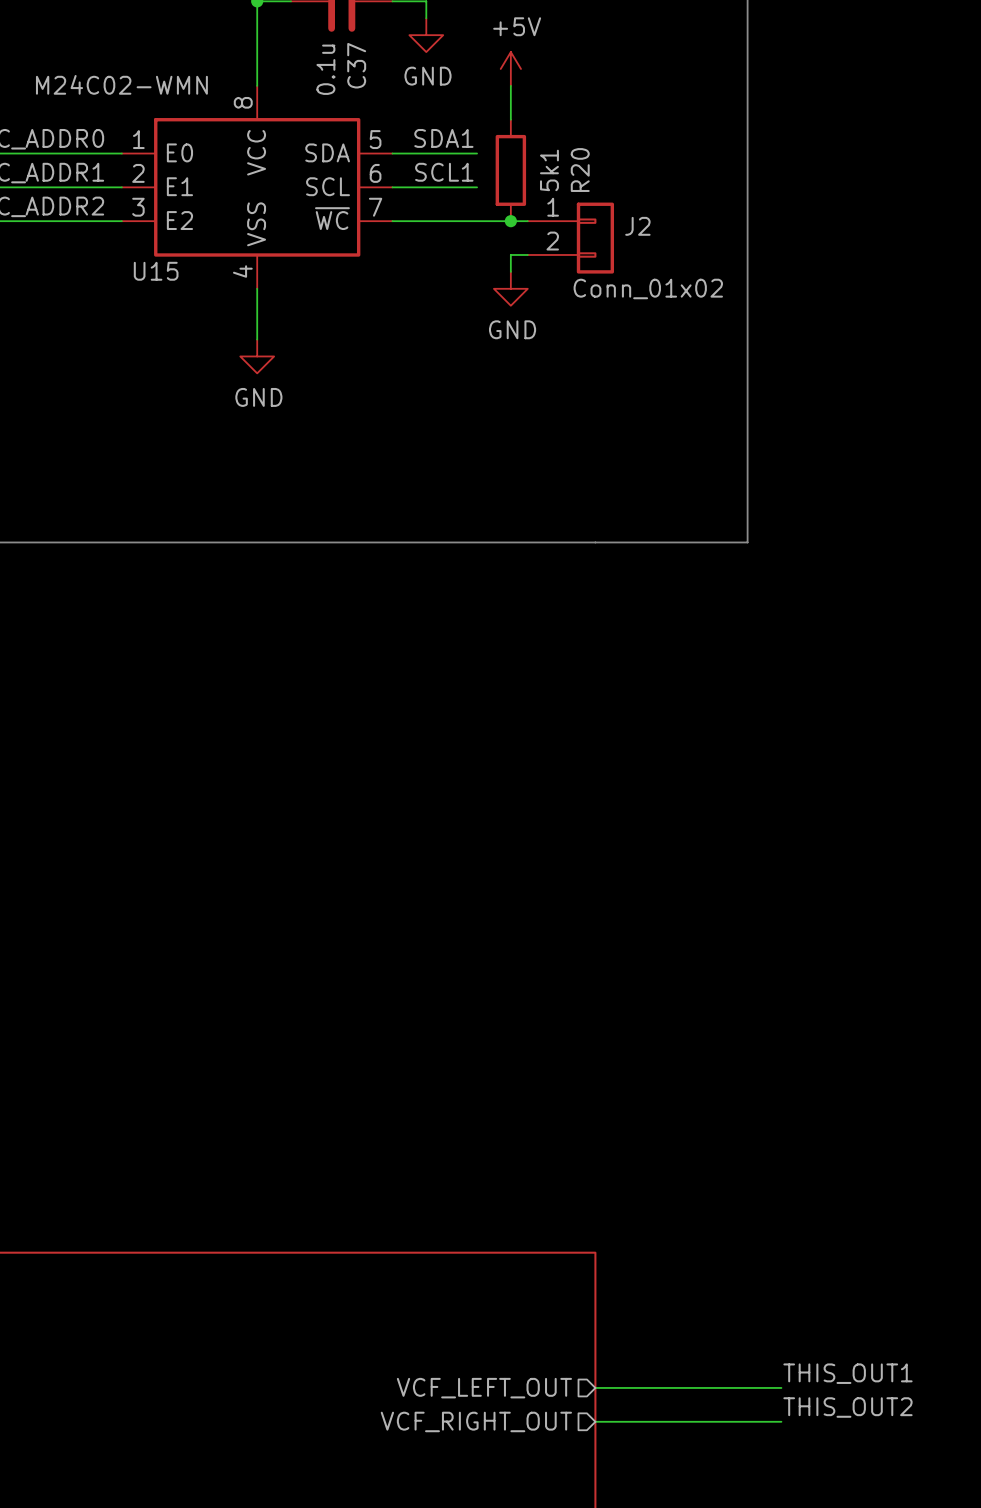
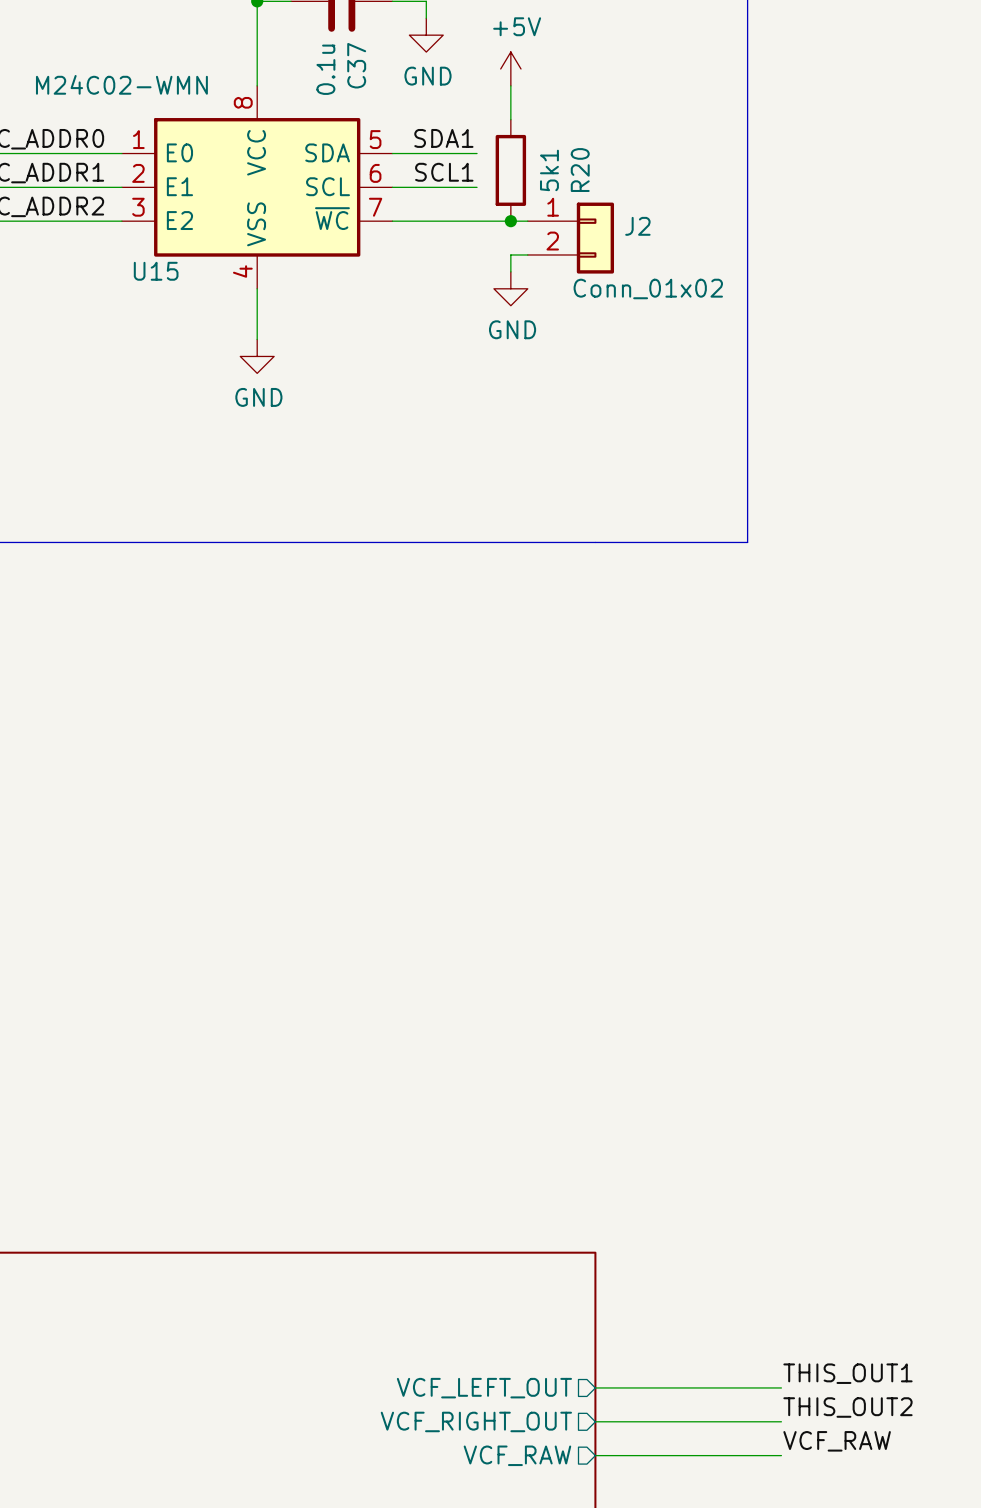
label: none -> VCF_RAW (837, 1441)
sheet pin: none -> VCF_RAW (517, 1455)
wire: none -> (595, 1455) (781, 1455)

